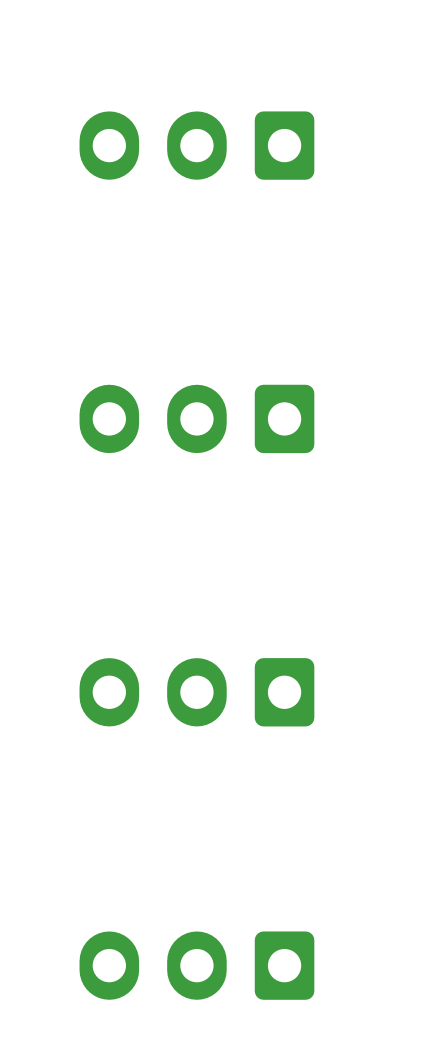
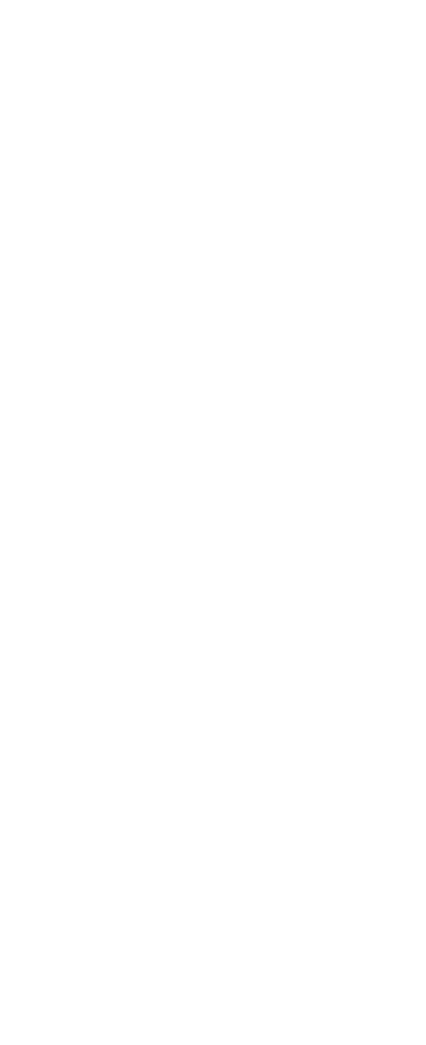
part: (196, 145) -> none
part: (196, 418) -> none
part: (196, 692) -> none
part: (196, 965) -> none

